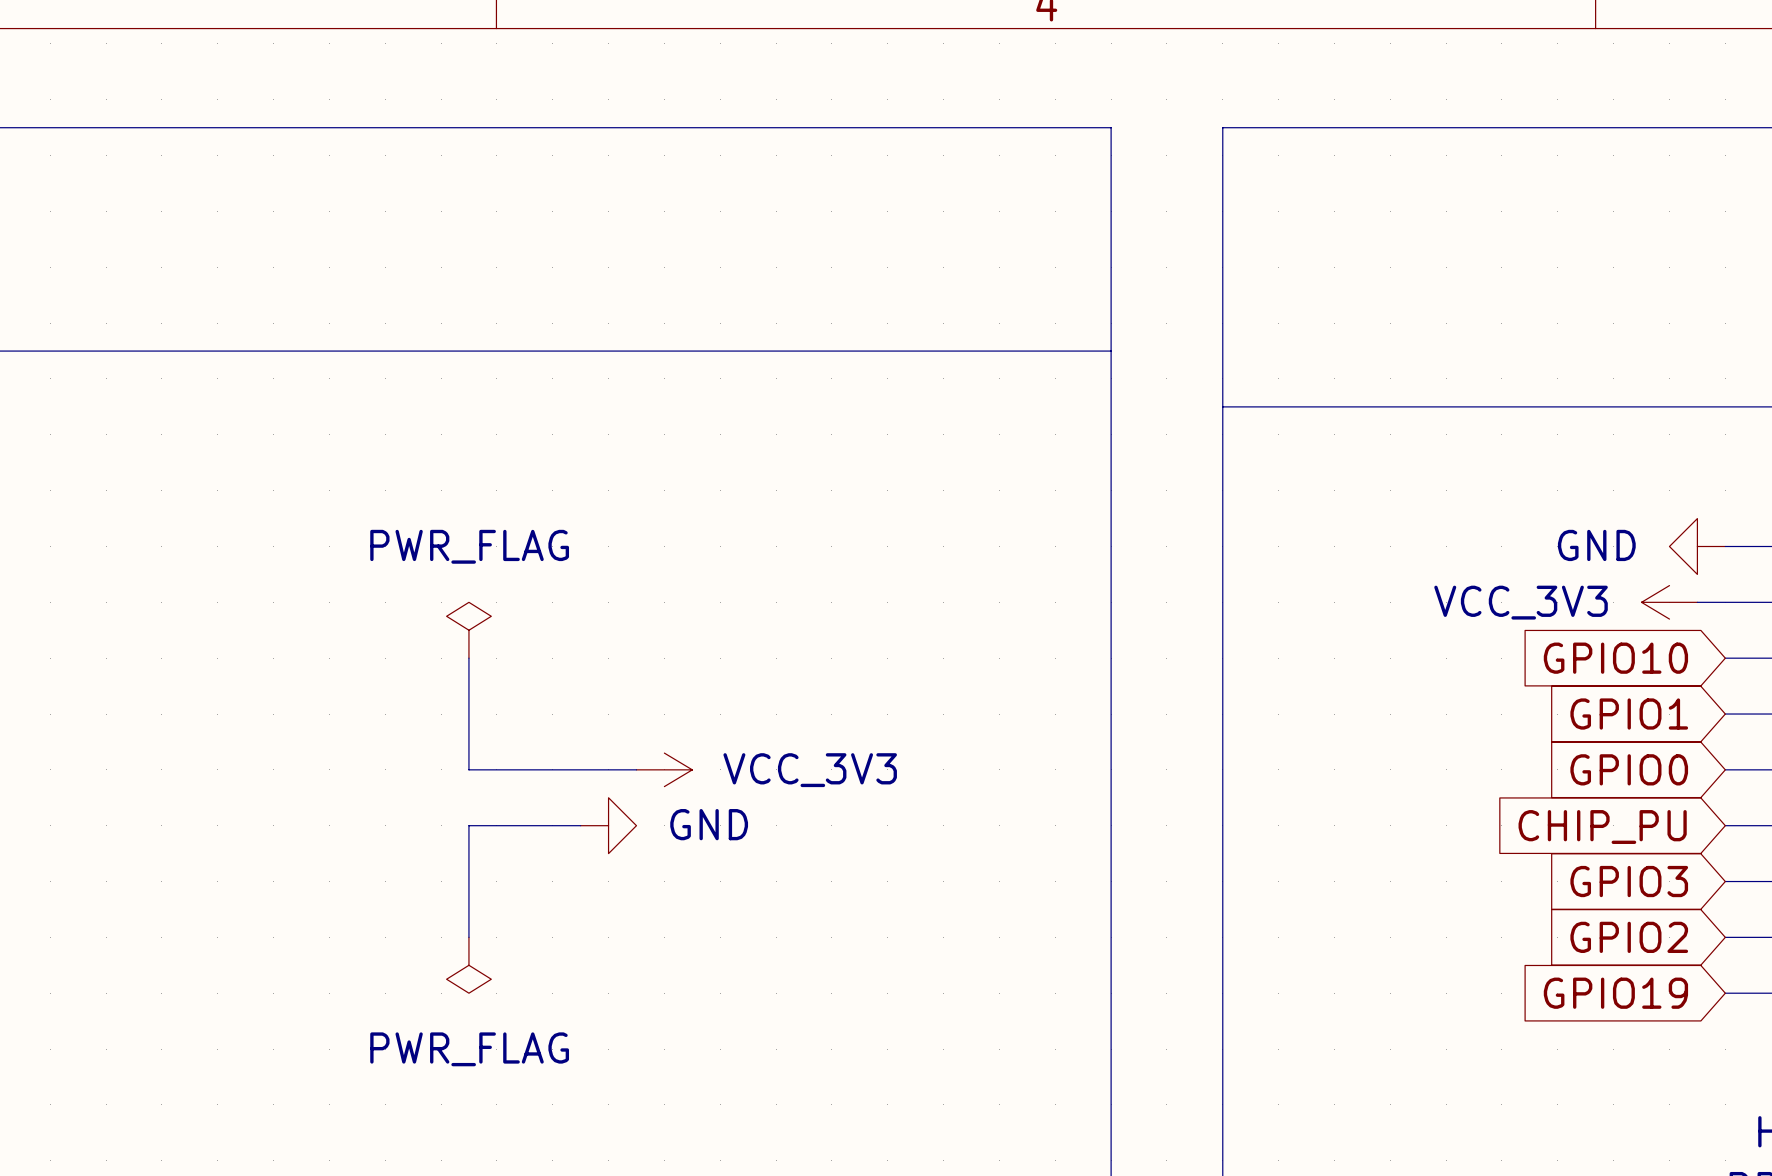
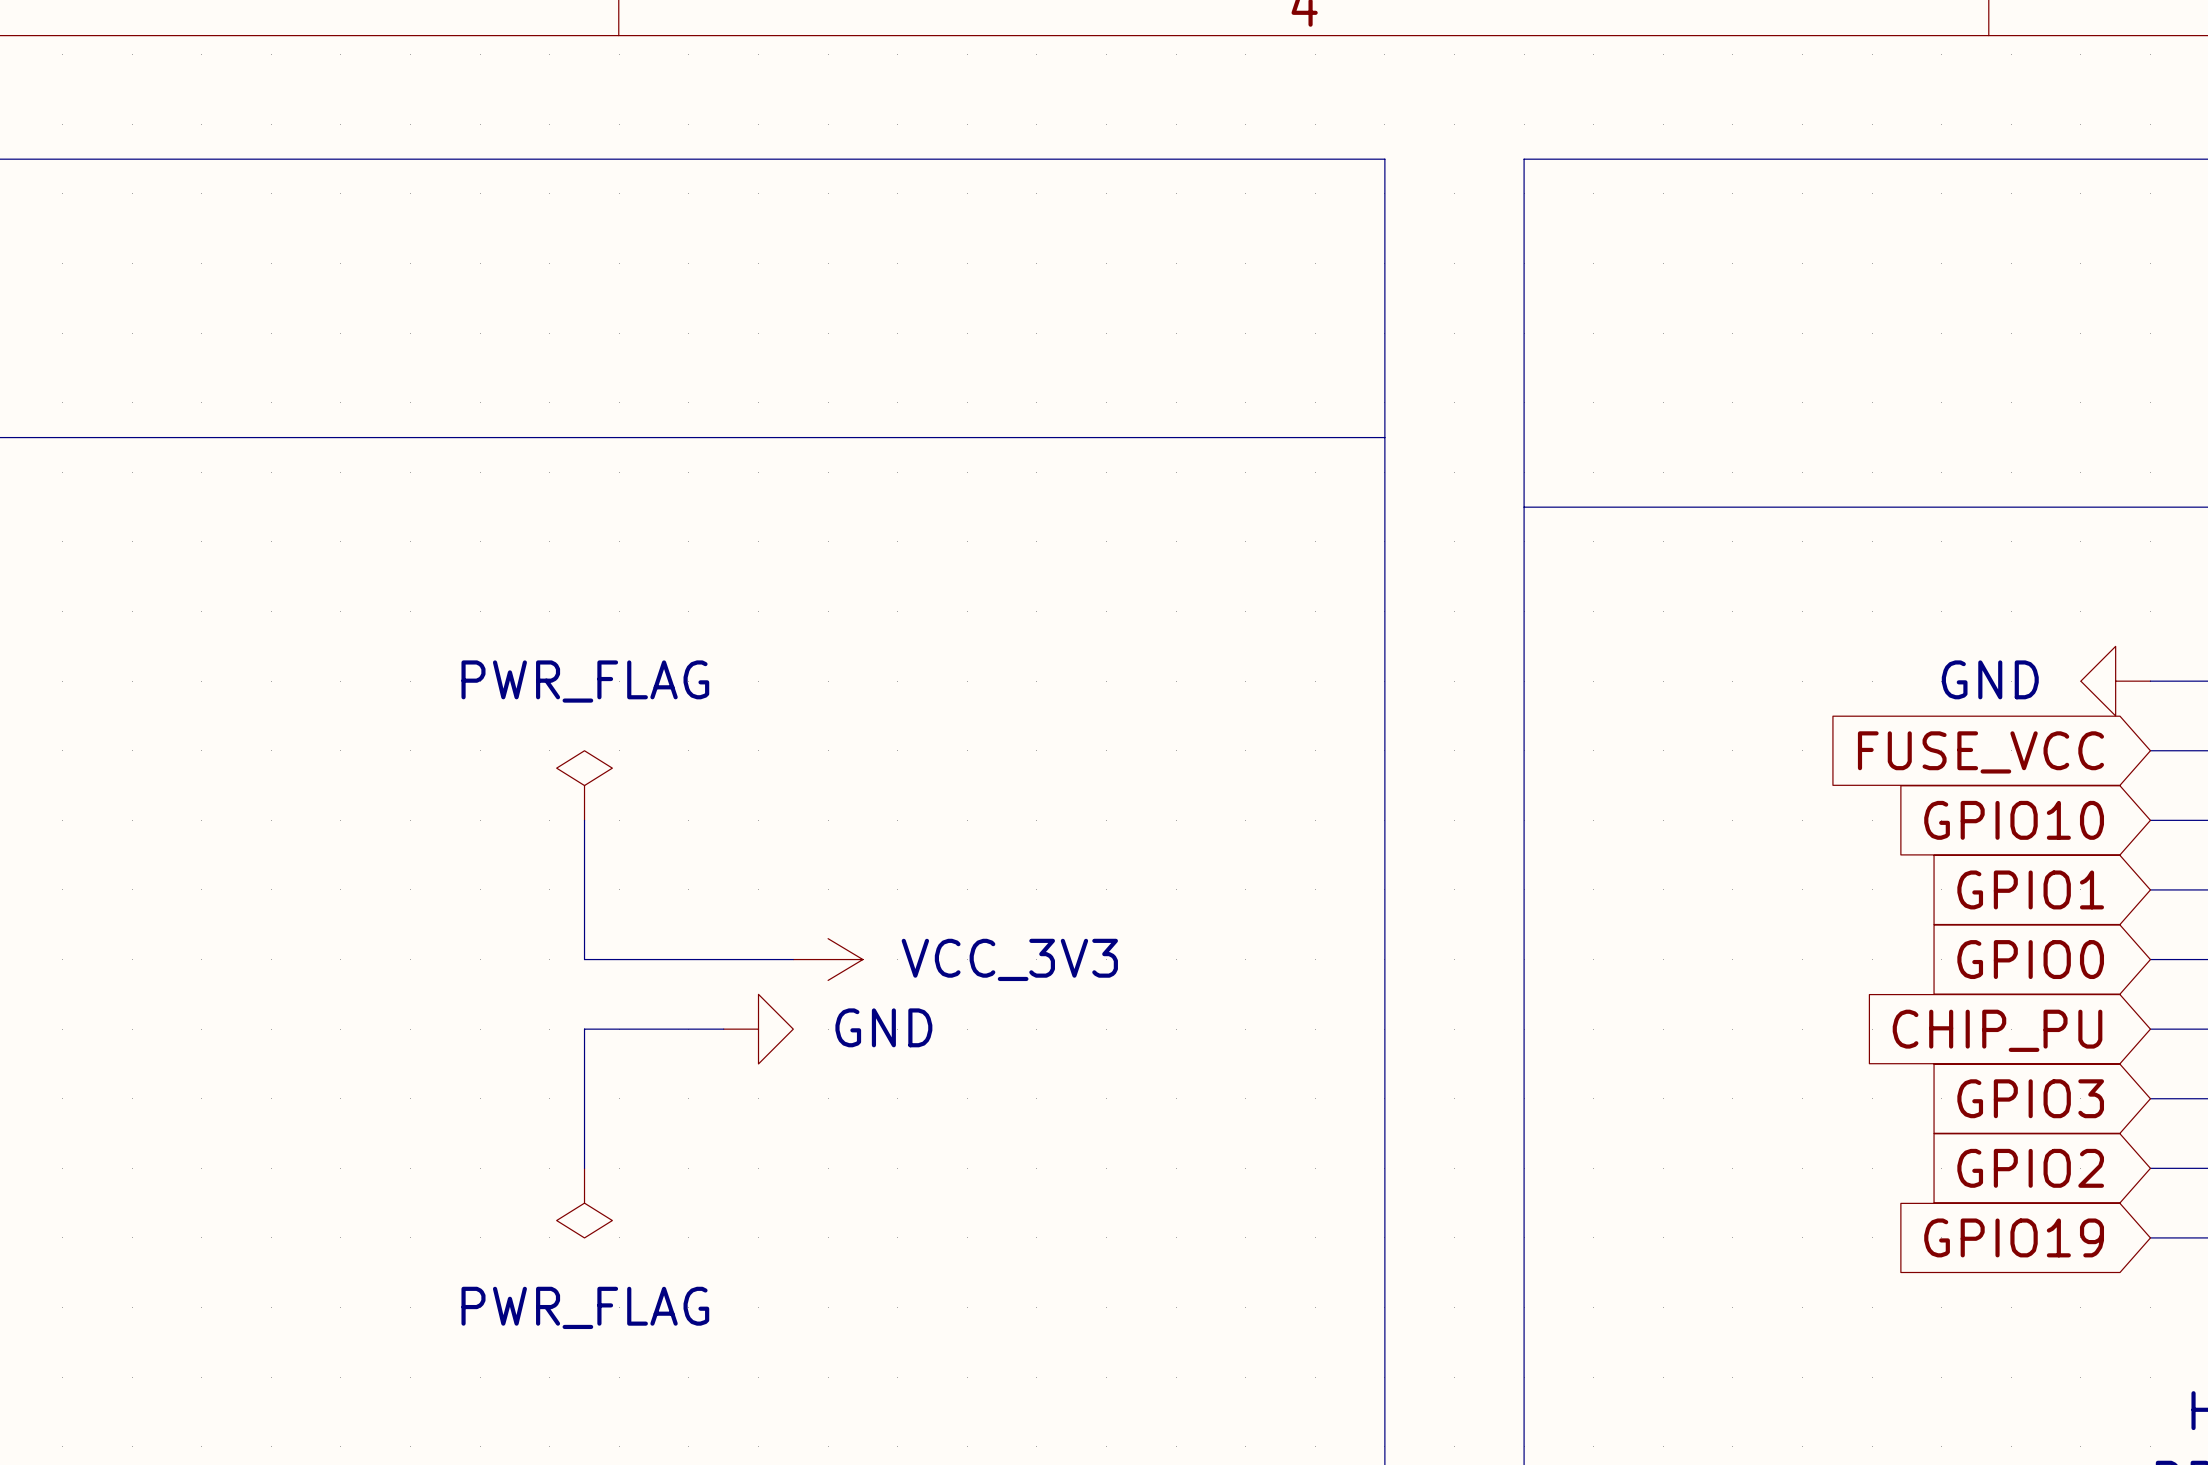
power symbol: VCC_3V3 (1669, 602) -> none
wire: (1697, 602) (1725, 602) -> none
global label: none -> FUSE_VCC (1980, 752)

